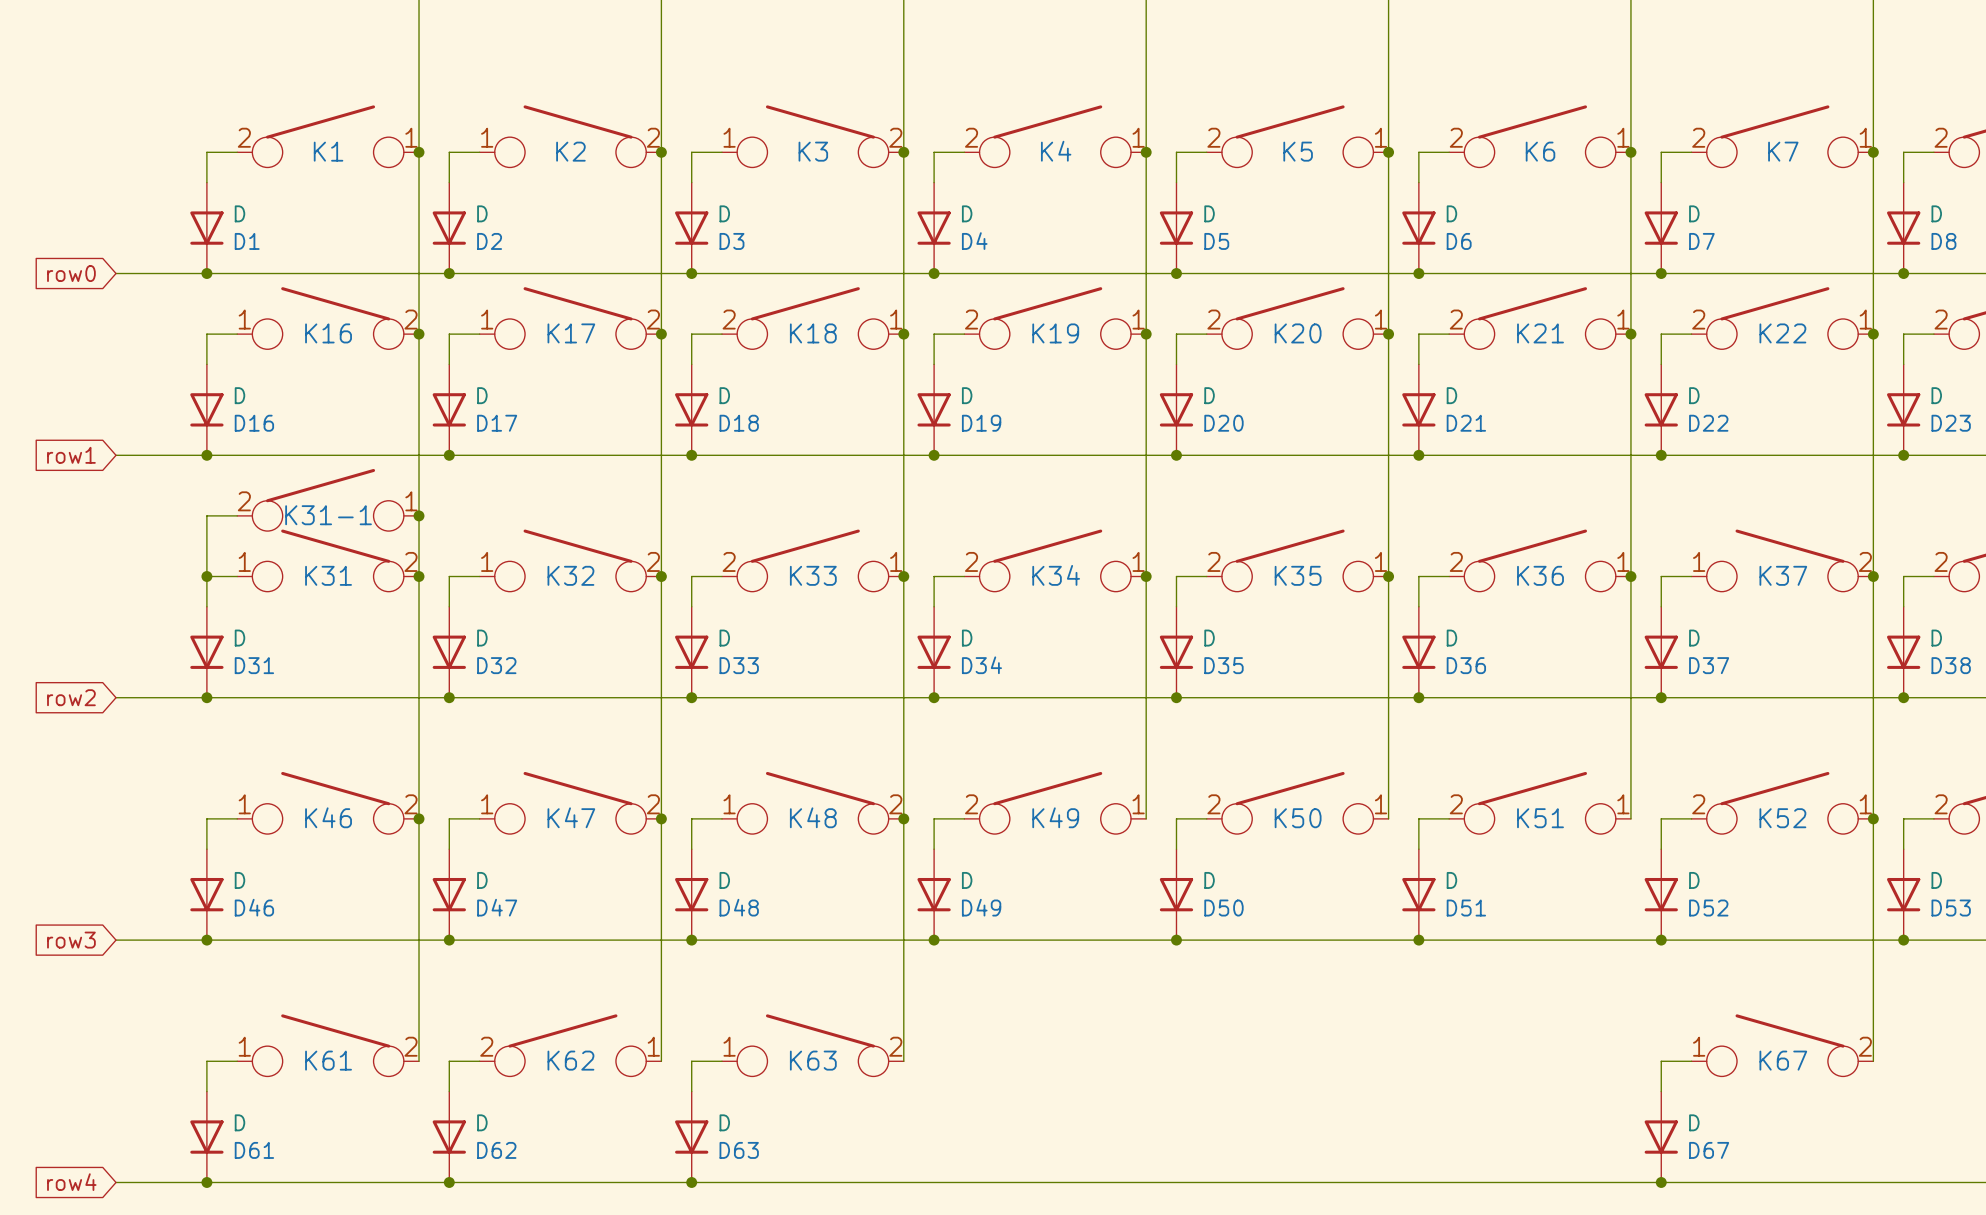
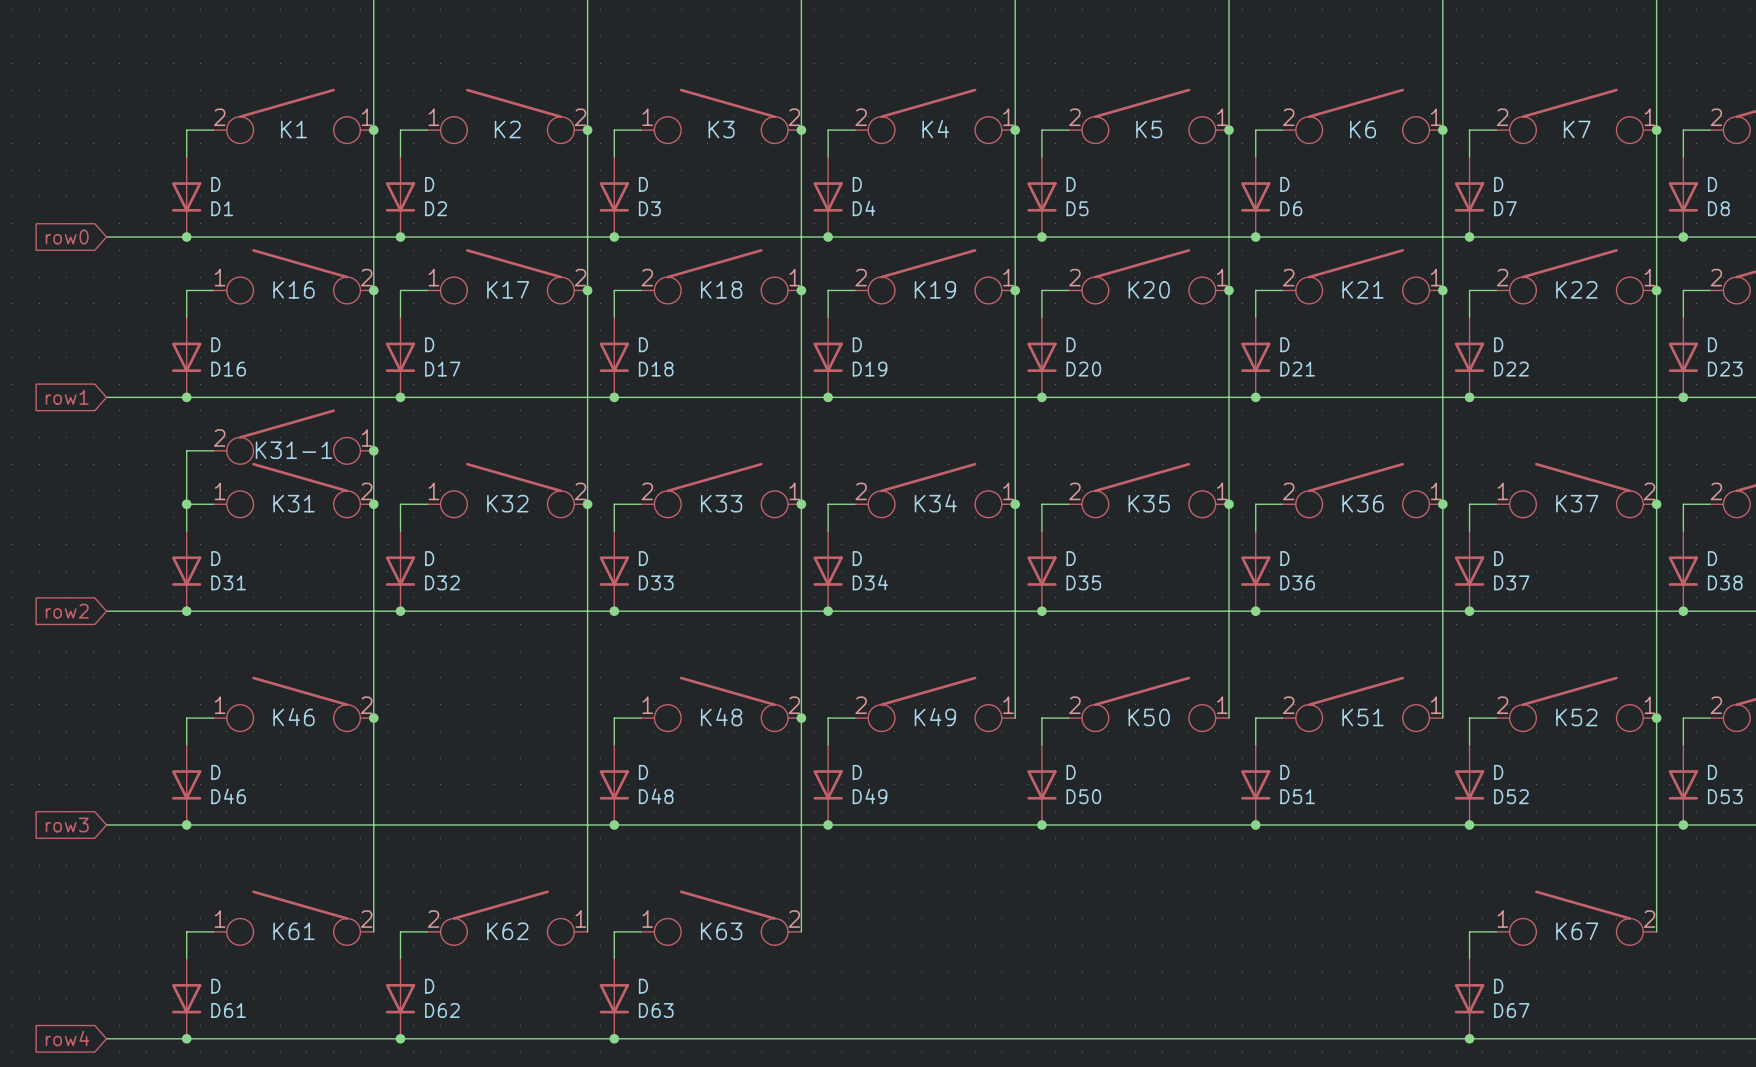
K47: (570, 802) -> none
wire: (479, 818) (449, 818) (449, 849) -> none
junction: (661, 818) -> none
D47: D (449, 894) -> none
junction: (449, 940) -> none

